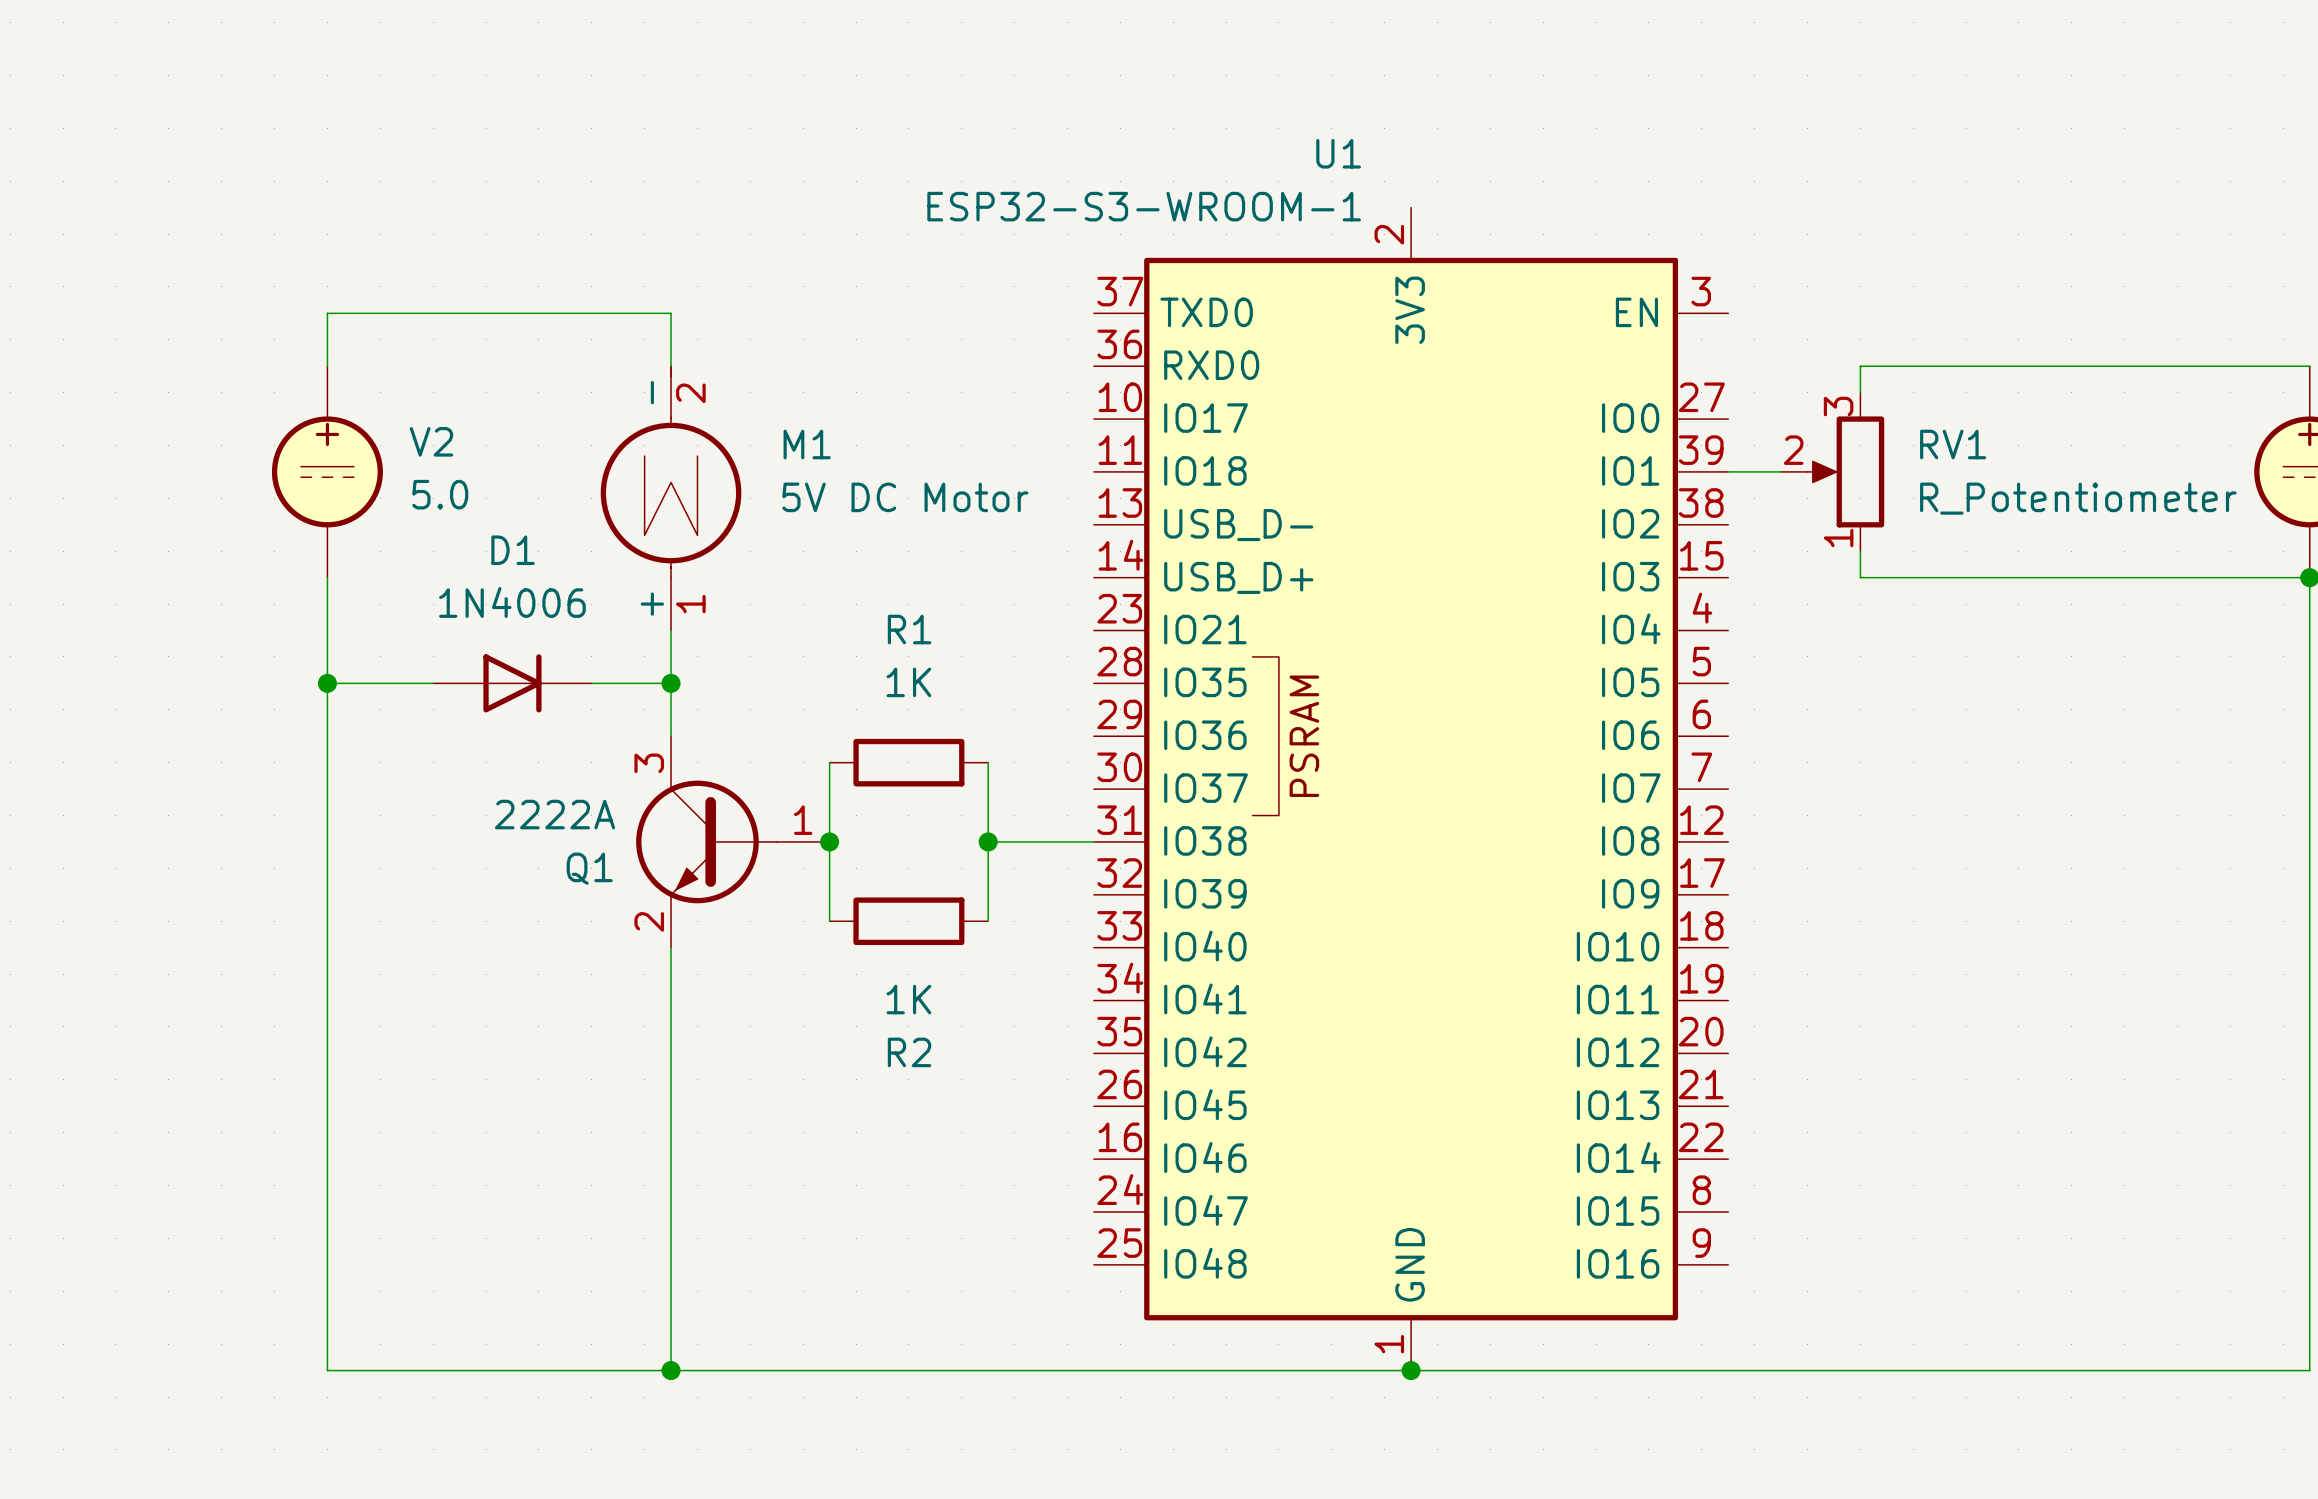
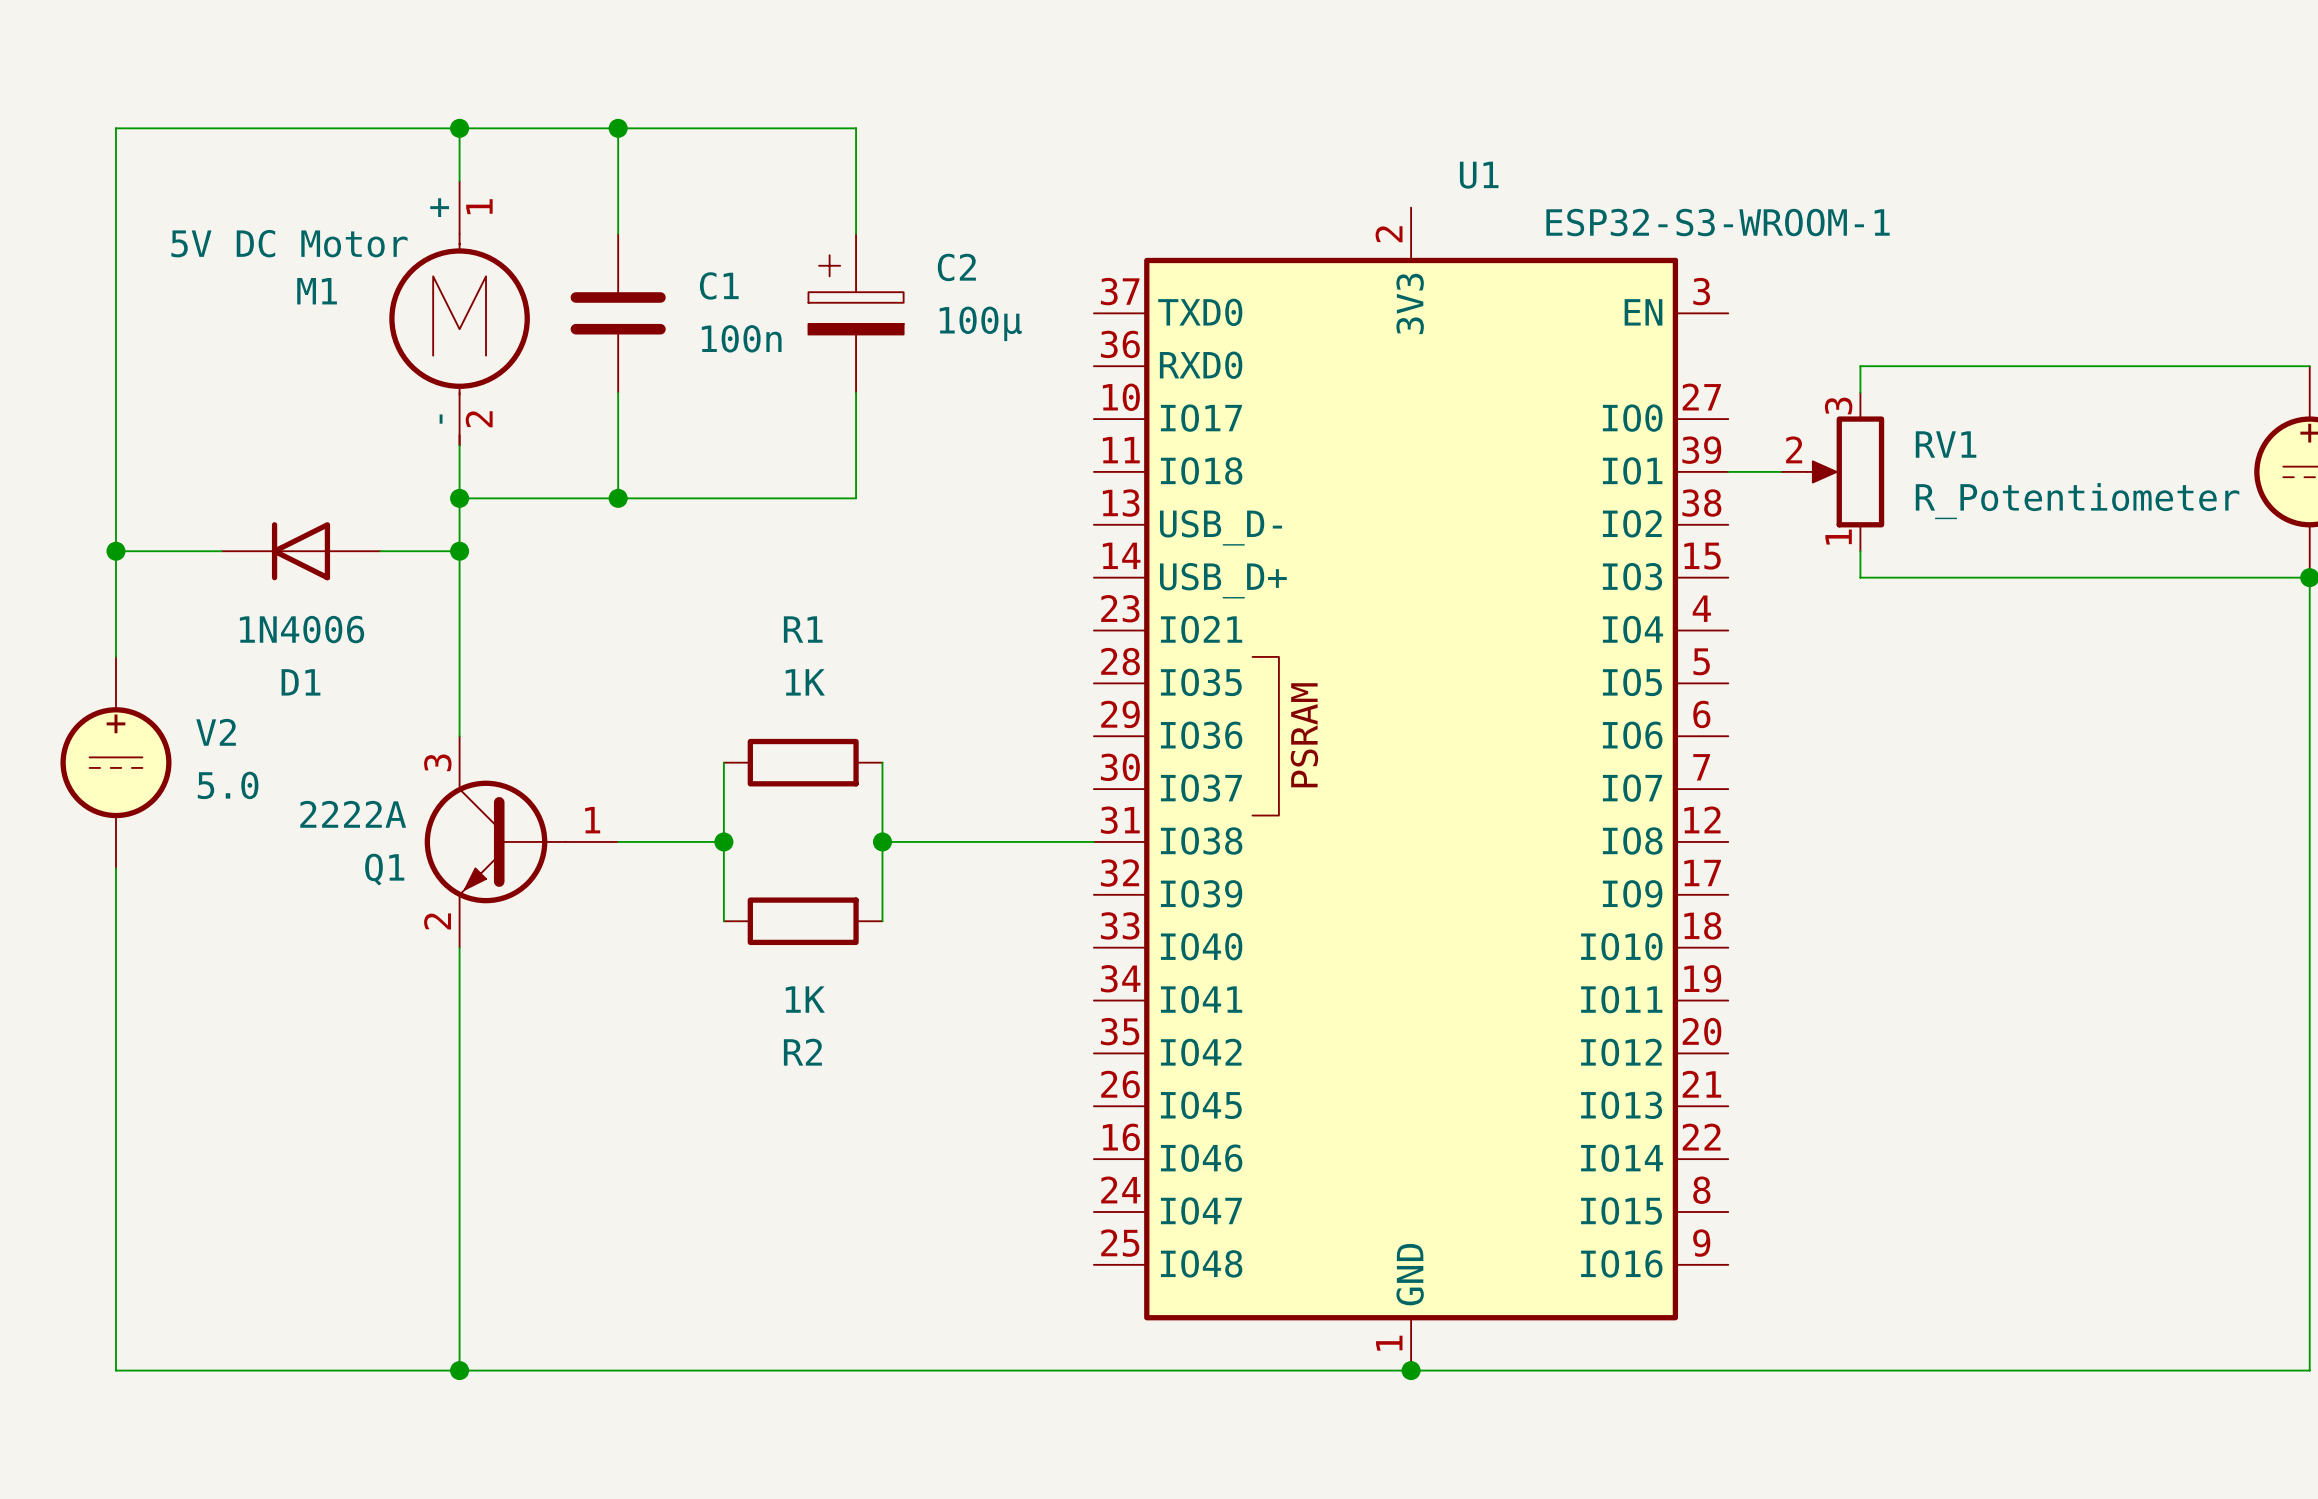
wire: none -> (459, 128) (459, 181)
junction: none -> (459, 128)
wire: none -> (618, 128) (618, 234)
junction: none -> (618, 128)
U1 name position: U1 (1338, 153) -> U1 (1479, 175)
U1 value position: ESP32-S3-WROOM-1 (1144, 206) -> ESP32-S3-WROOM-1 (1718, 222)
wire: none -> (856, 234) (856, 128) (115, 128) (115, 656)
C1: none -> 100n (618, 313)
C2: none -> 100μ (856, 313)
wire: (327, 366) (327, 313) (671, 313) (671, 366) -> none
wire: none -> (856, 392) (856, 498) (459, 498)
M1 name position: M1 (807, 444) -> M1 (317, 291)
wire: none -> (459, 445) (459, 736)
V2 position: (327, 471) -> (115, 762)
M1 rotation: 0° (671, 471) -> 180° (459, 339)
M1 value position: 5V DC Motor (905, 497) -> 5V DC Motor (289, 243)
junction: none -> (459, 498)
junction: none -> (618, 498)
M1 position: (671, 498) -> (459, 313)
junction: none -> (115, 551)
junction: none -> (459, 551)
wire: (327, 577) (327, 1370) -> (115, 868) (115, 1370) (327, 1370)
wire: (671, 630) (671, 736) -> (618, 392) (618, 498)
wire: (327, 683) (433, 683) -> (115, 551) (221, 551)
junction: (327, 683) -> none
D1 rotation: 0° (512, 683) -> 180° (301, 551)
D1 position: (512, 683) -> (301, 551)
wire: (591, 683) (671, 683) -> (380, 551) (459, 551)
junction: (671, 683) -> none
wire: (829, 762) (829, 921) -> (723, 762) (723, 921)
R1 position: (908, 762) -> (803, 762)
wire: (988, 762) (988, 921) -> (882, 762) (882, 921)
wire: none -> (618, 841) (723, 841)
junction: none -> (723, 841)
Q1 position: (732, 841) -> (521, 841)
junction: (829, 841) -> none
wire: none -> (882, 841) (988, 841)
junction: none -> (882, 841)
junction: (988, 841) -> none
R2 position: (908, 921) -> (803, 921)
wire: (671, 947) (671, 1370) -> (459, 947) (459, 1370)
junction: none -> (459, 1370)
junction: (671, 1370) -> none

